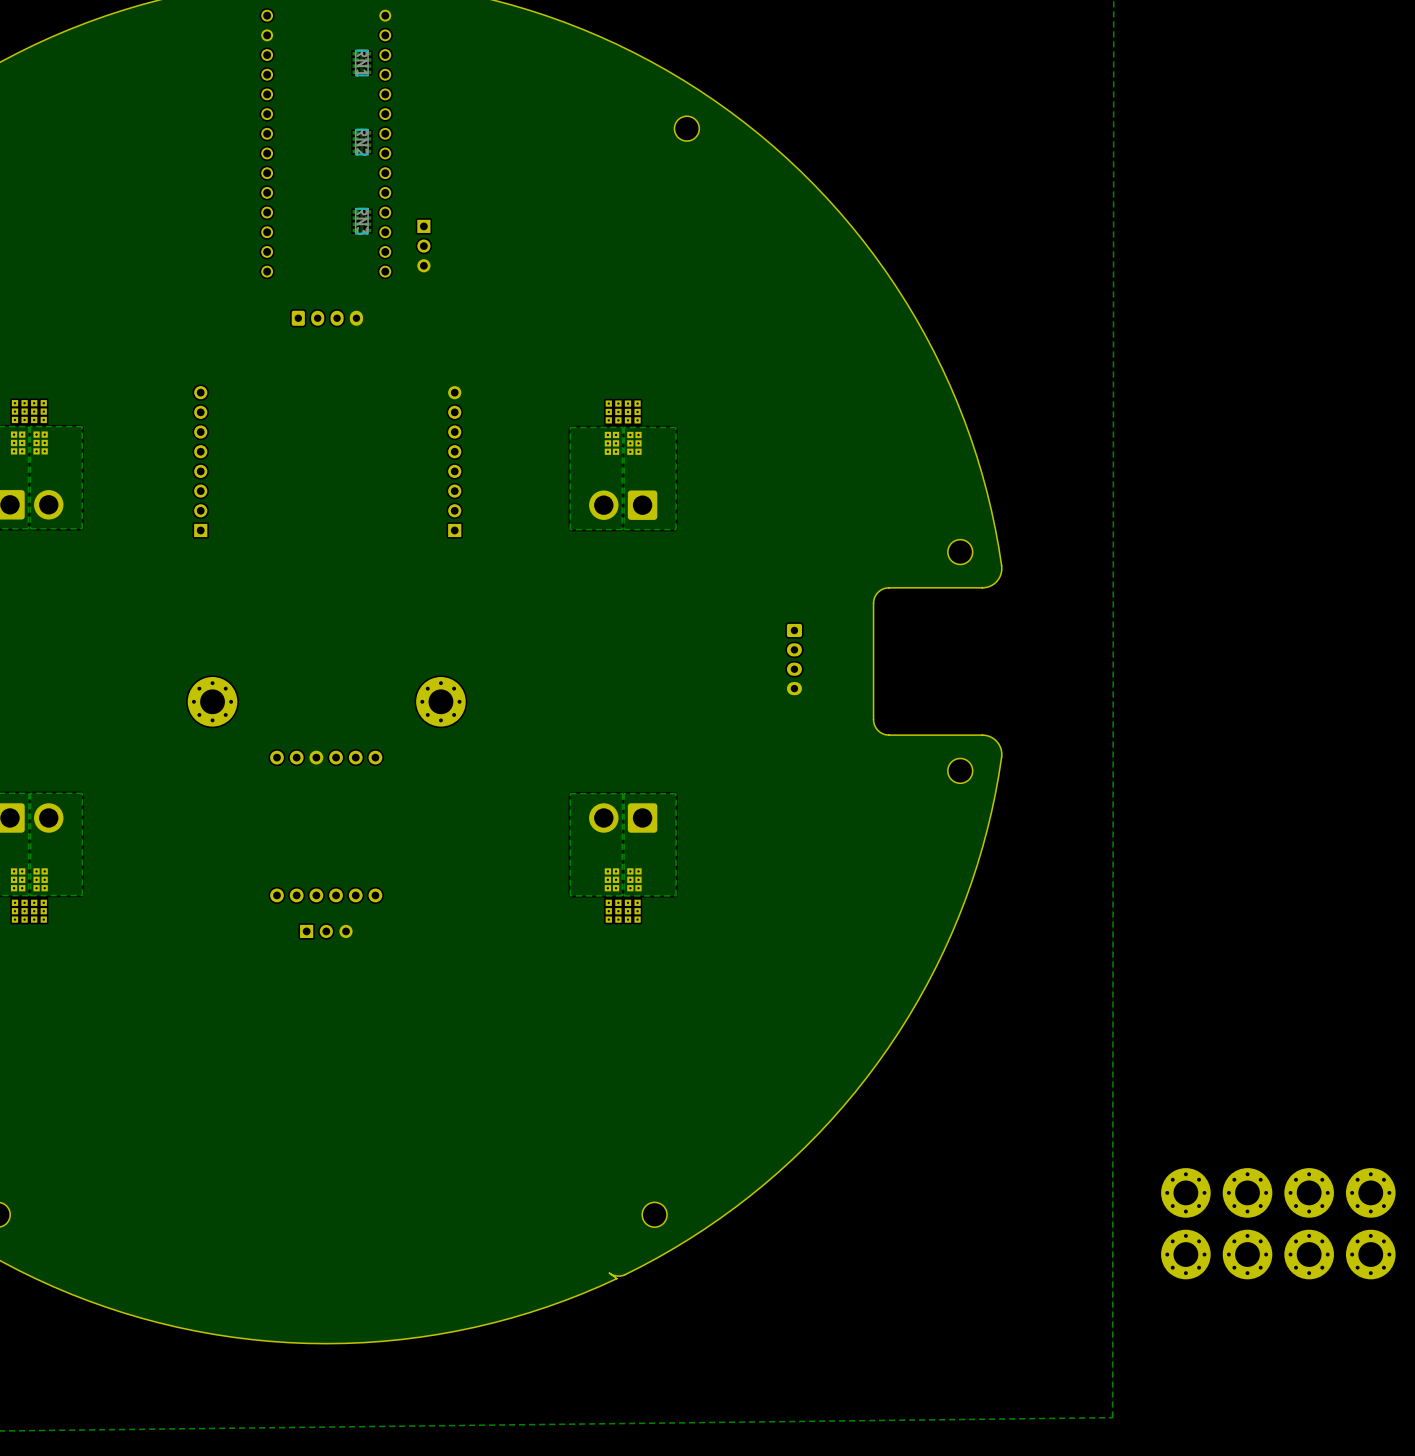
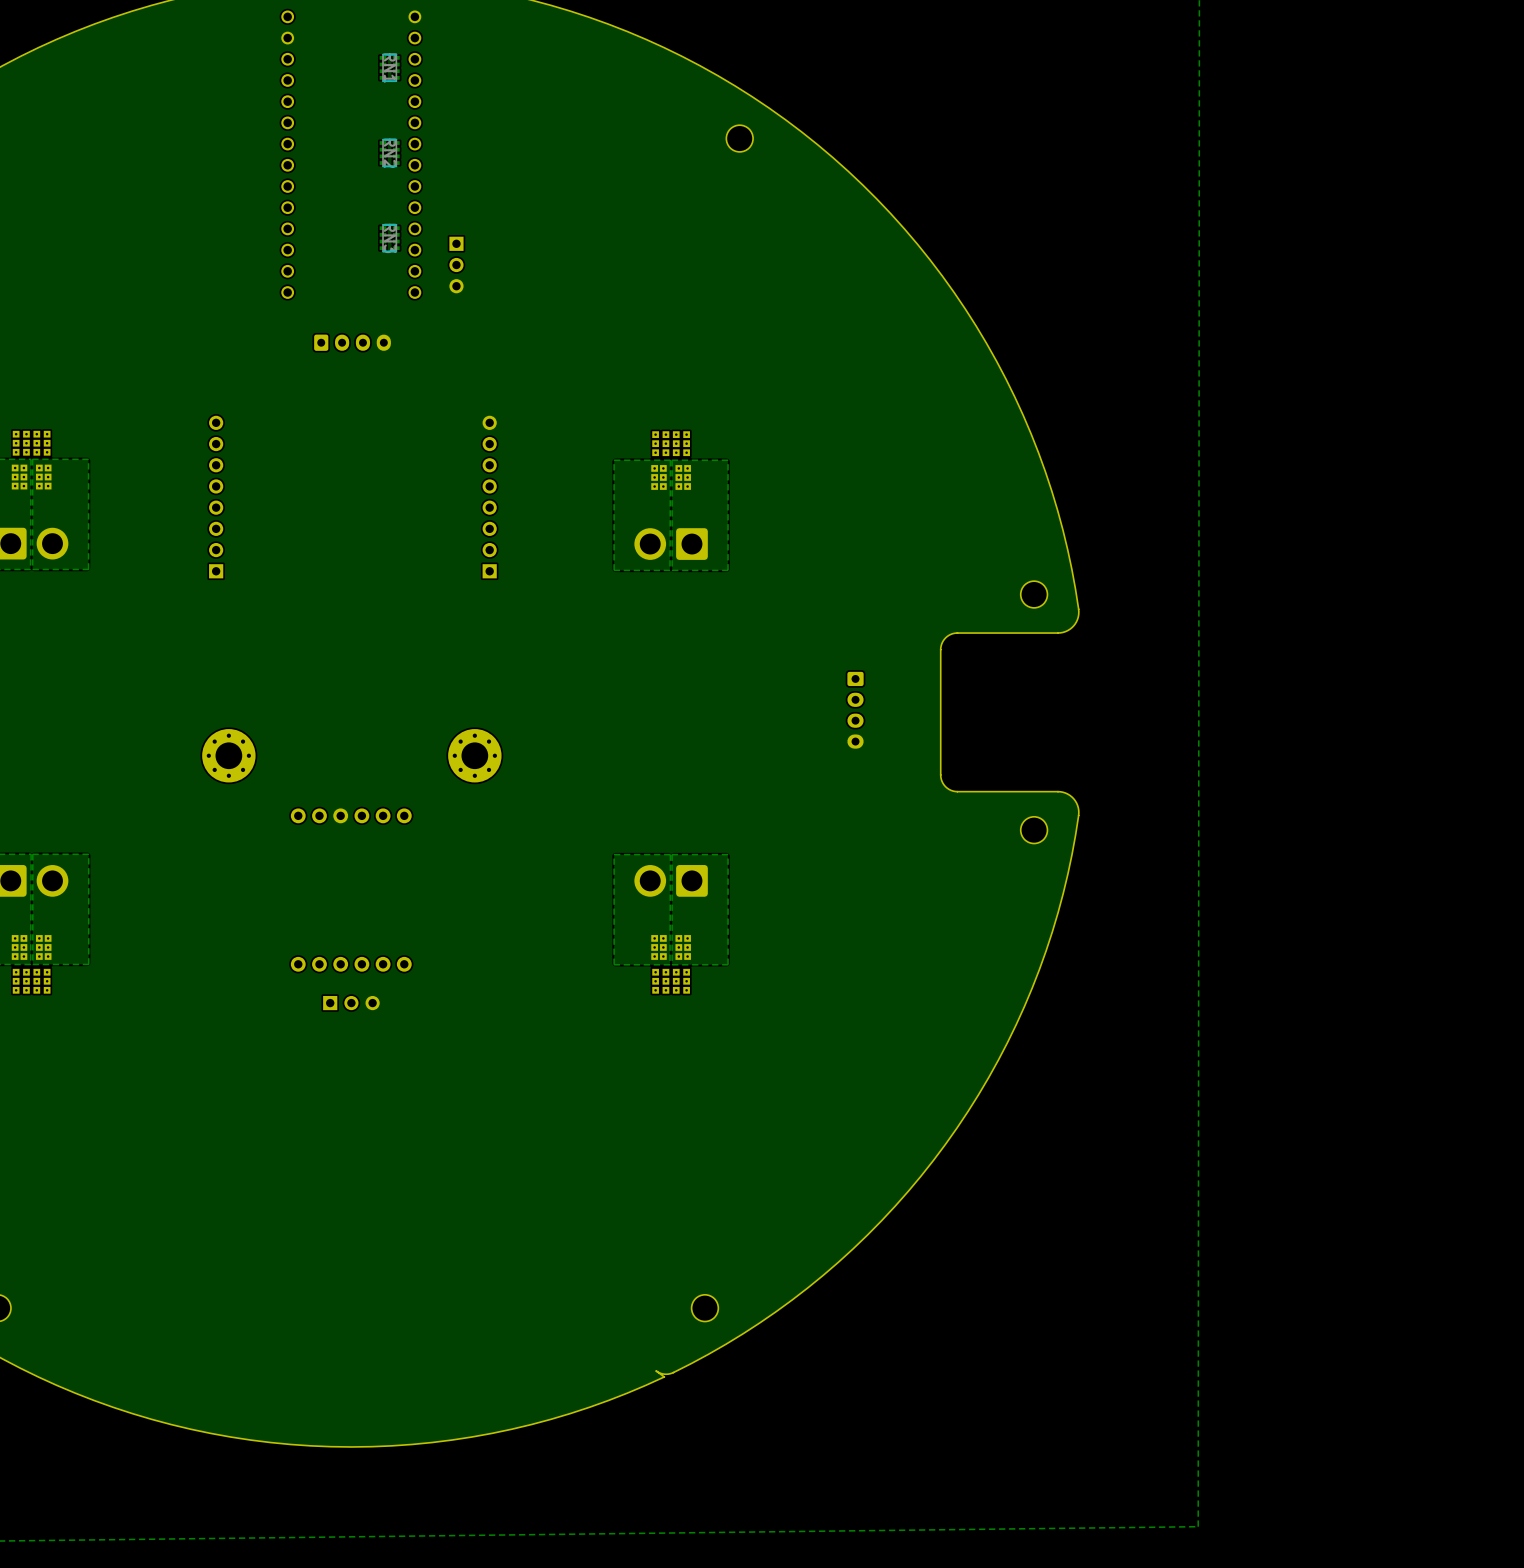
part: (1185, 1192) -> none
part: (1247, 1192) -> none
part: (1309, 1192) -> none
part: (1370, 1192) -> none
part: (1185, 1254) -> none
part: (1247, 1254) -> none
part: (1309, 1254) -> none
part: (1370, 1254) -> none

